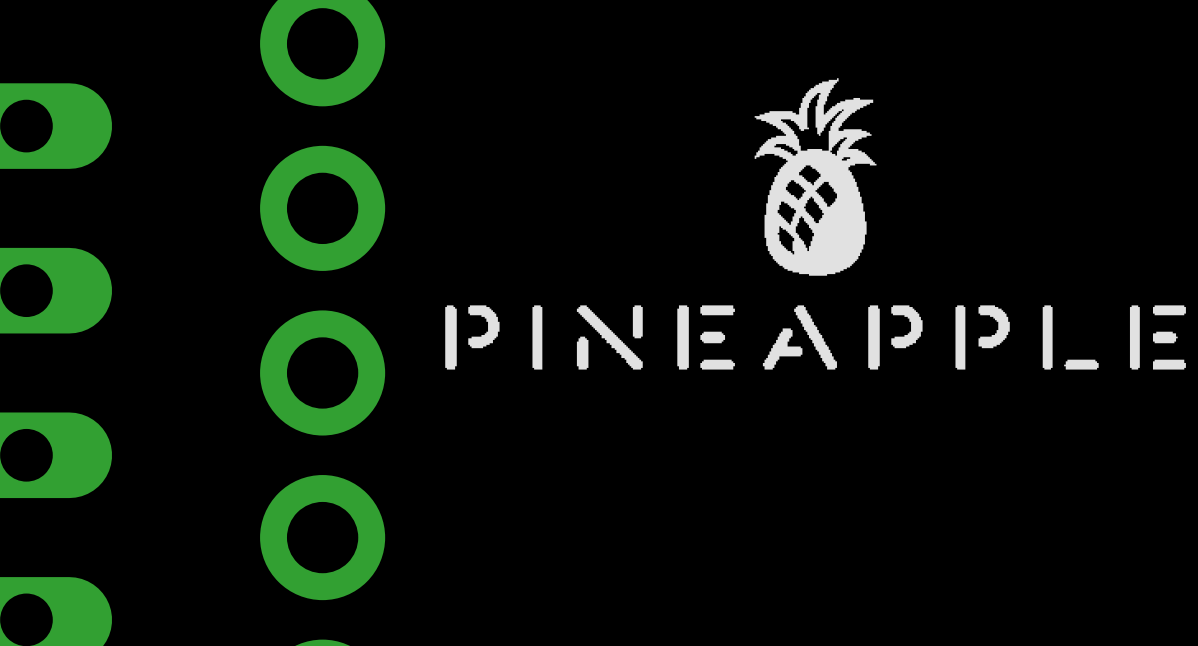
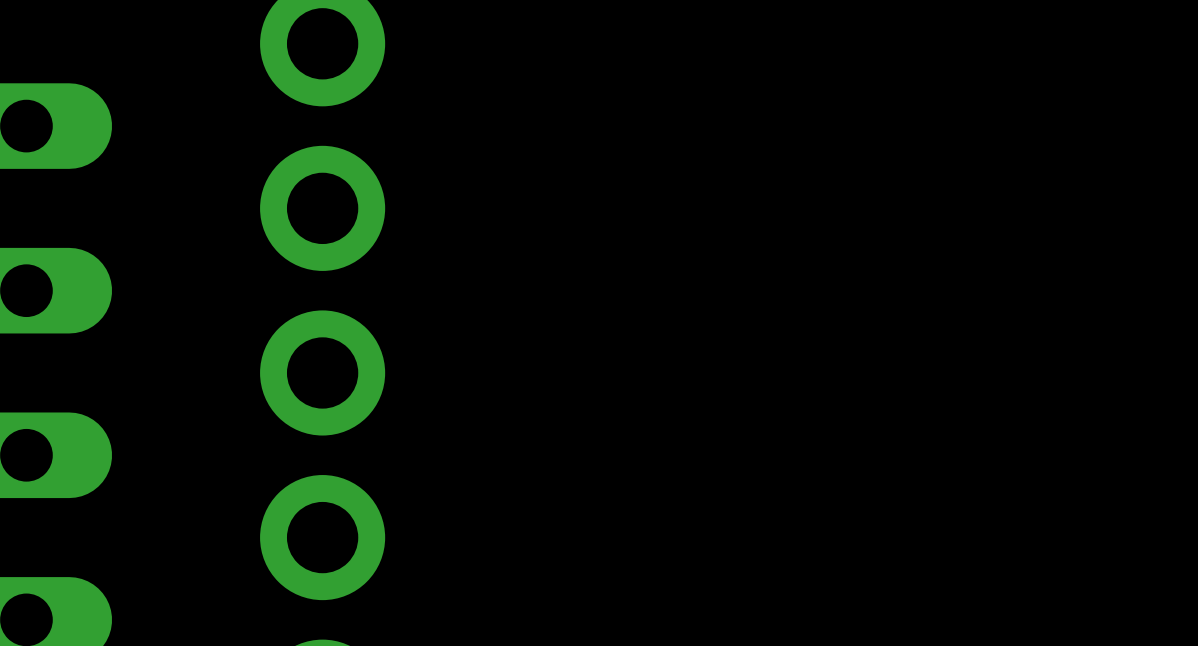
drawing: [445, 78, 1186, 370] -> none

